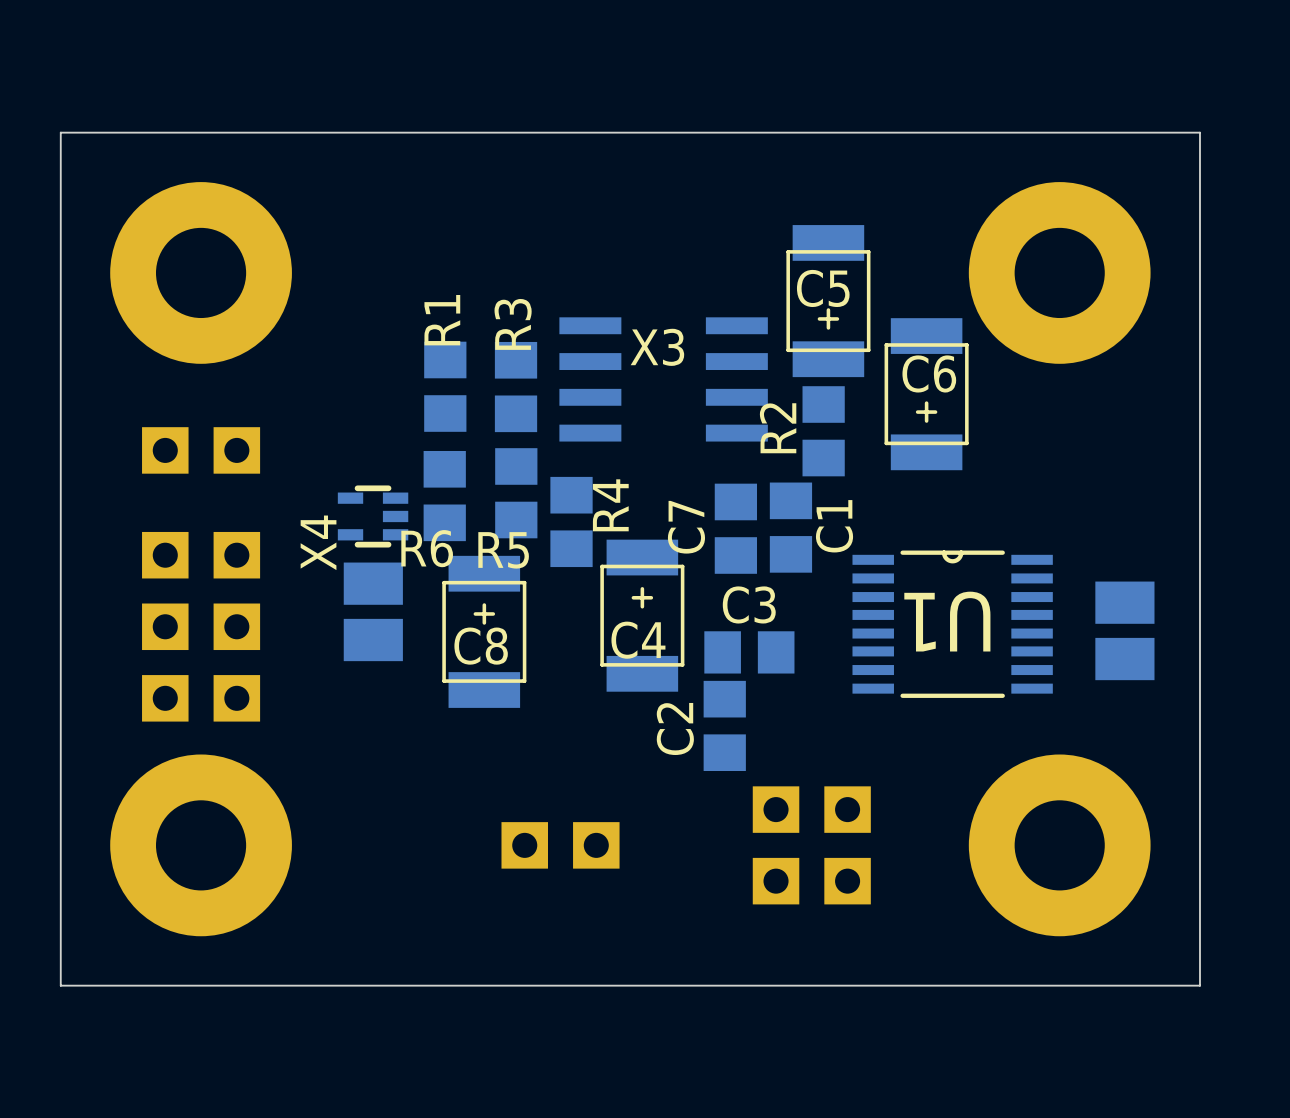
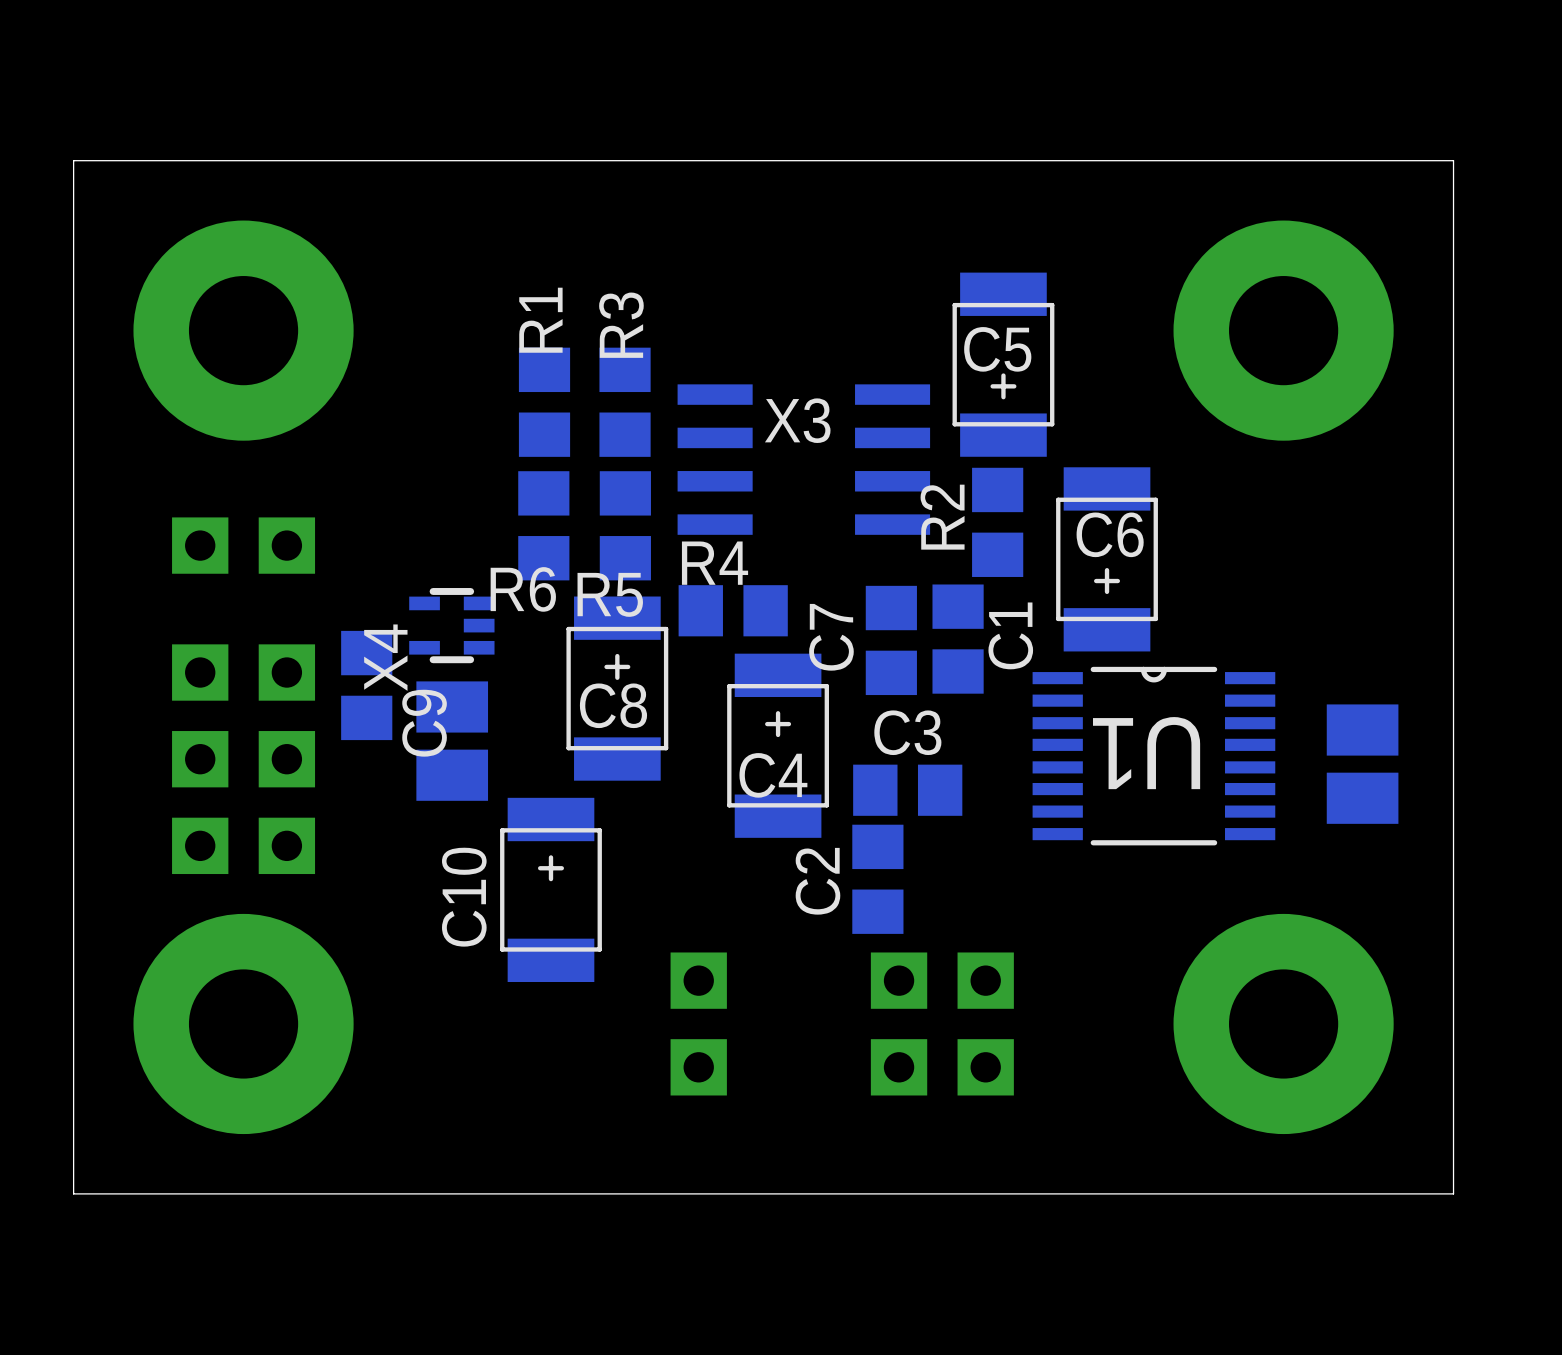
R1 position: (445, 386) -> (544, 402)
R3 position: (516, 387) -> (625, 402)
C6 position: (926, 394) -> (1107, 559)
R5 position: (516, 493) -> (625, 525)
R6 position: (444, 496) -> (543, 525)
R4 name position: R4 (610, 505) -> R4 (715, 563)
R4 rotation: 0° (571, 521) -> 90° clockwise (733, 610)
C9: none -> (366, 685)
C8 position: (484, 631) -> (617, 688)
C10: none -> (550, 889)
part rotation: 0° (560, 845) -> 90° clockwise (698, 1023)
part position: (811, 845) -> (942, 1023)

